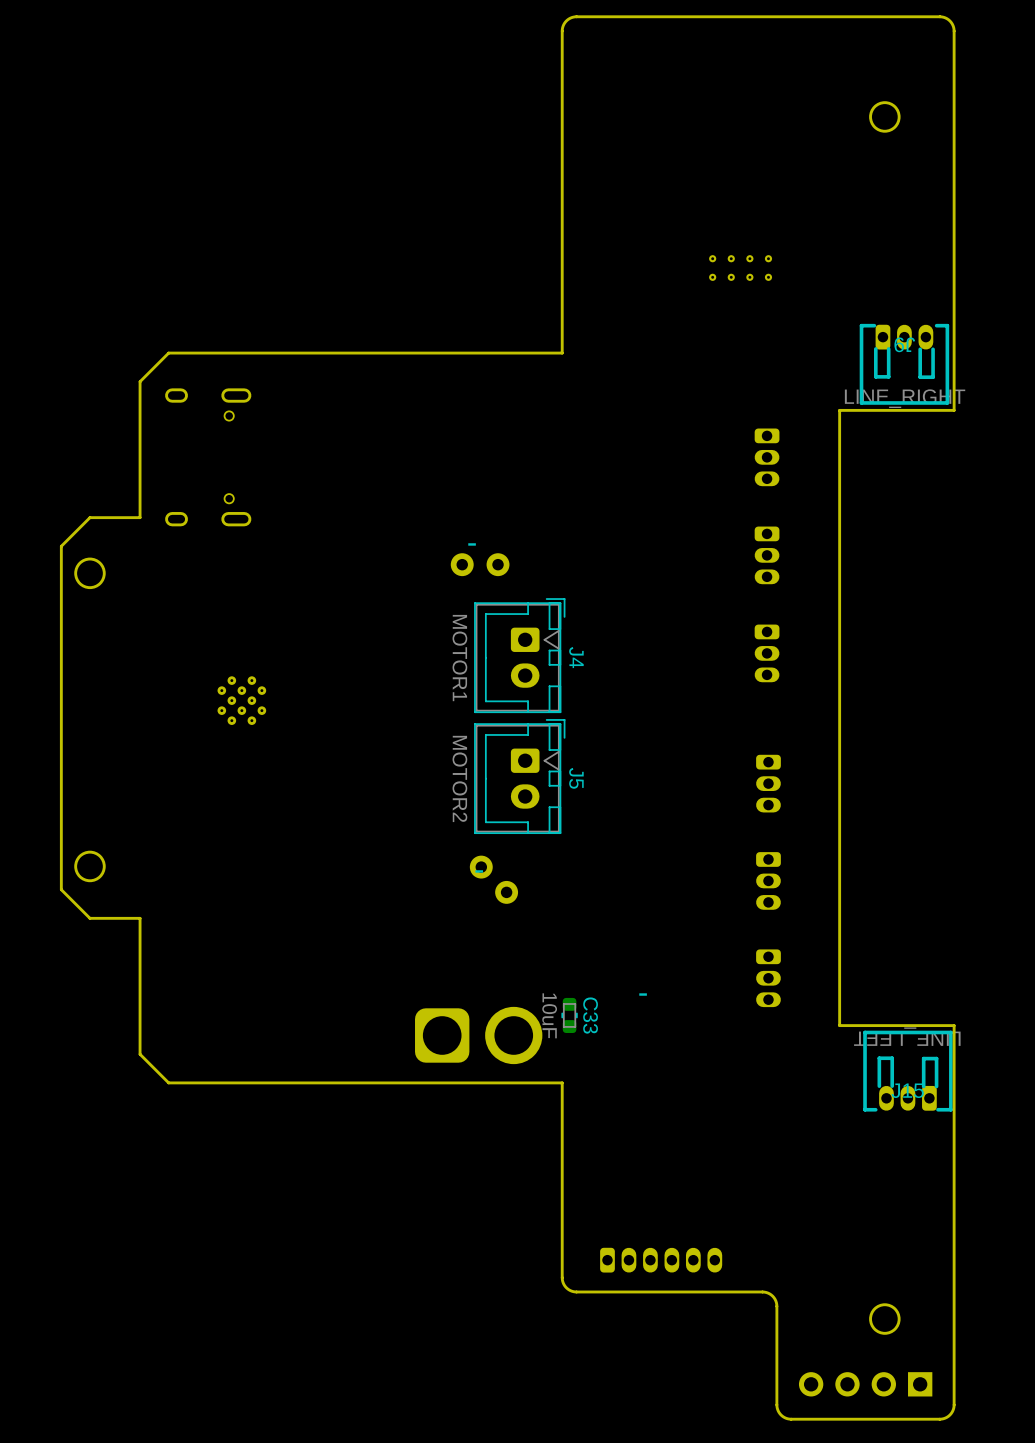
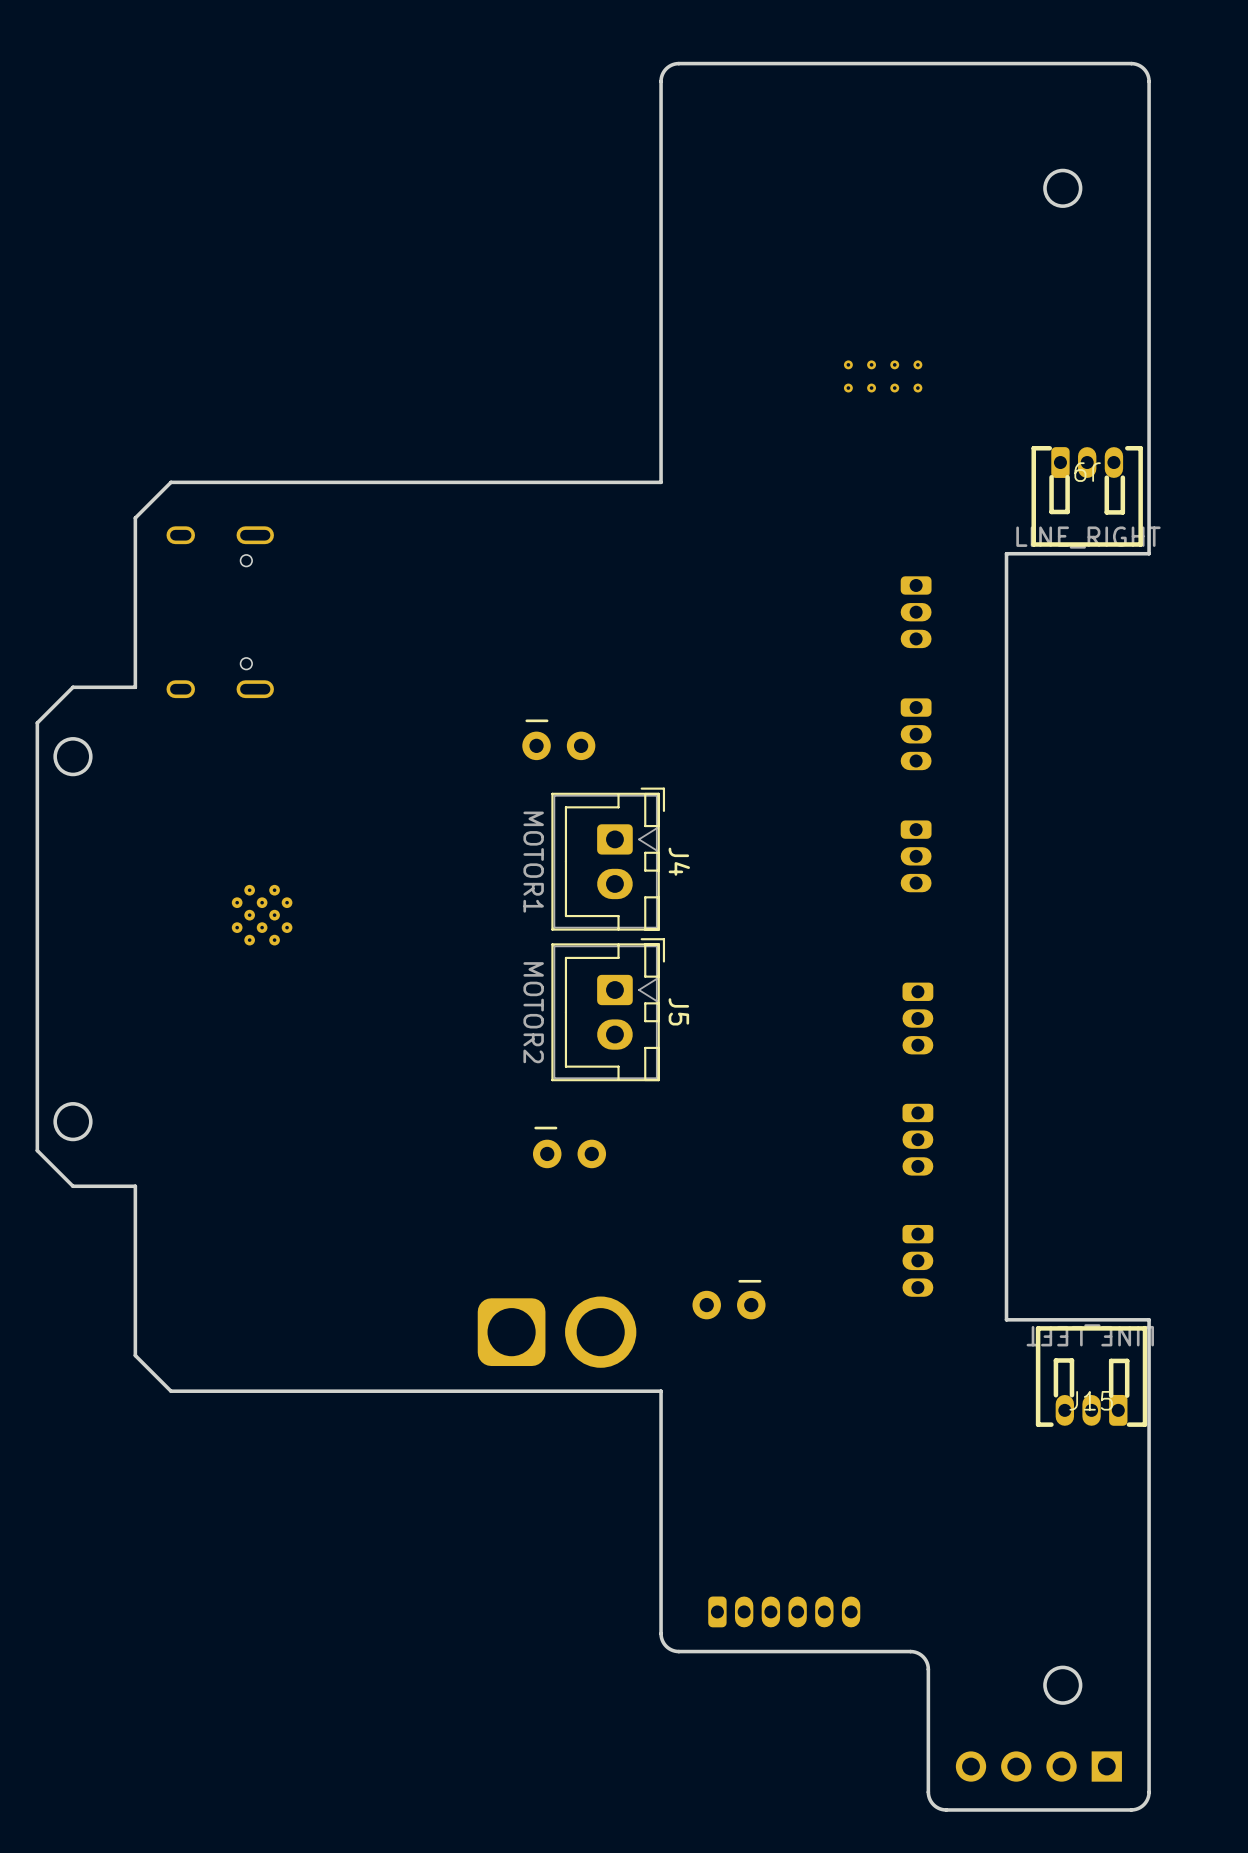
part rotation: 0° (493, 879) -> 45° counterclockwise (569, 1153)
part: none -> (729, 1305)
C33: 10uF (569, 1015) -> none

